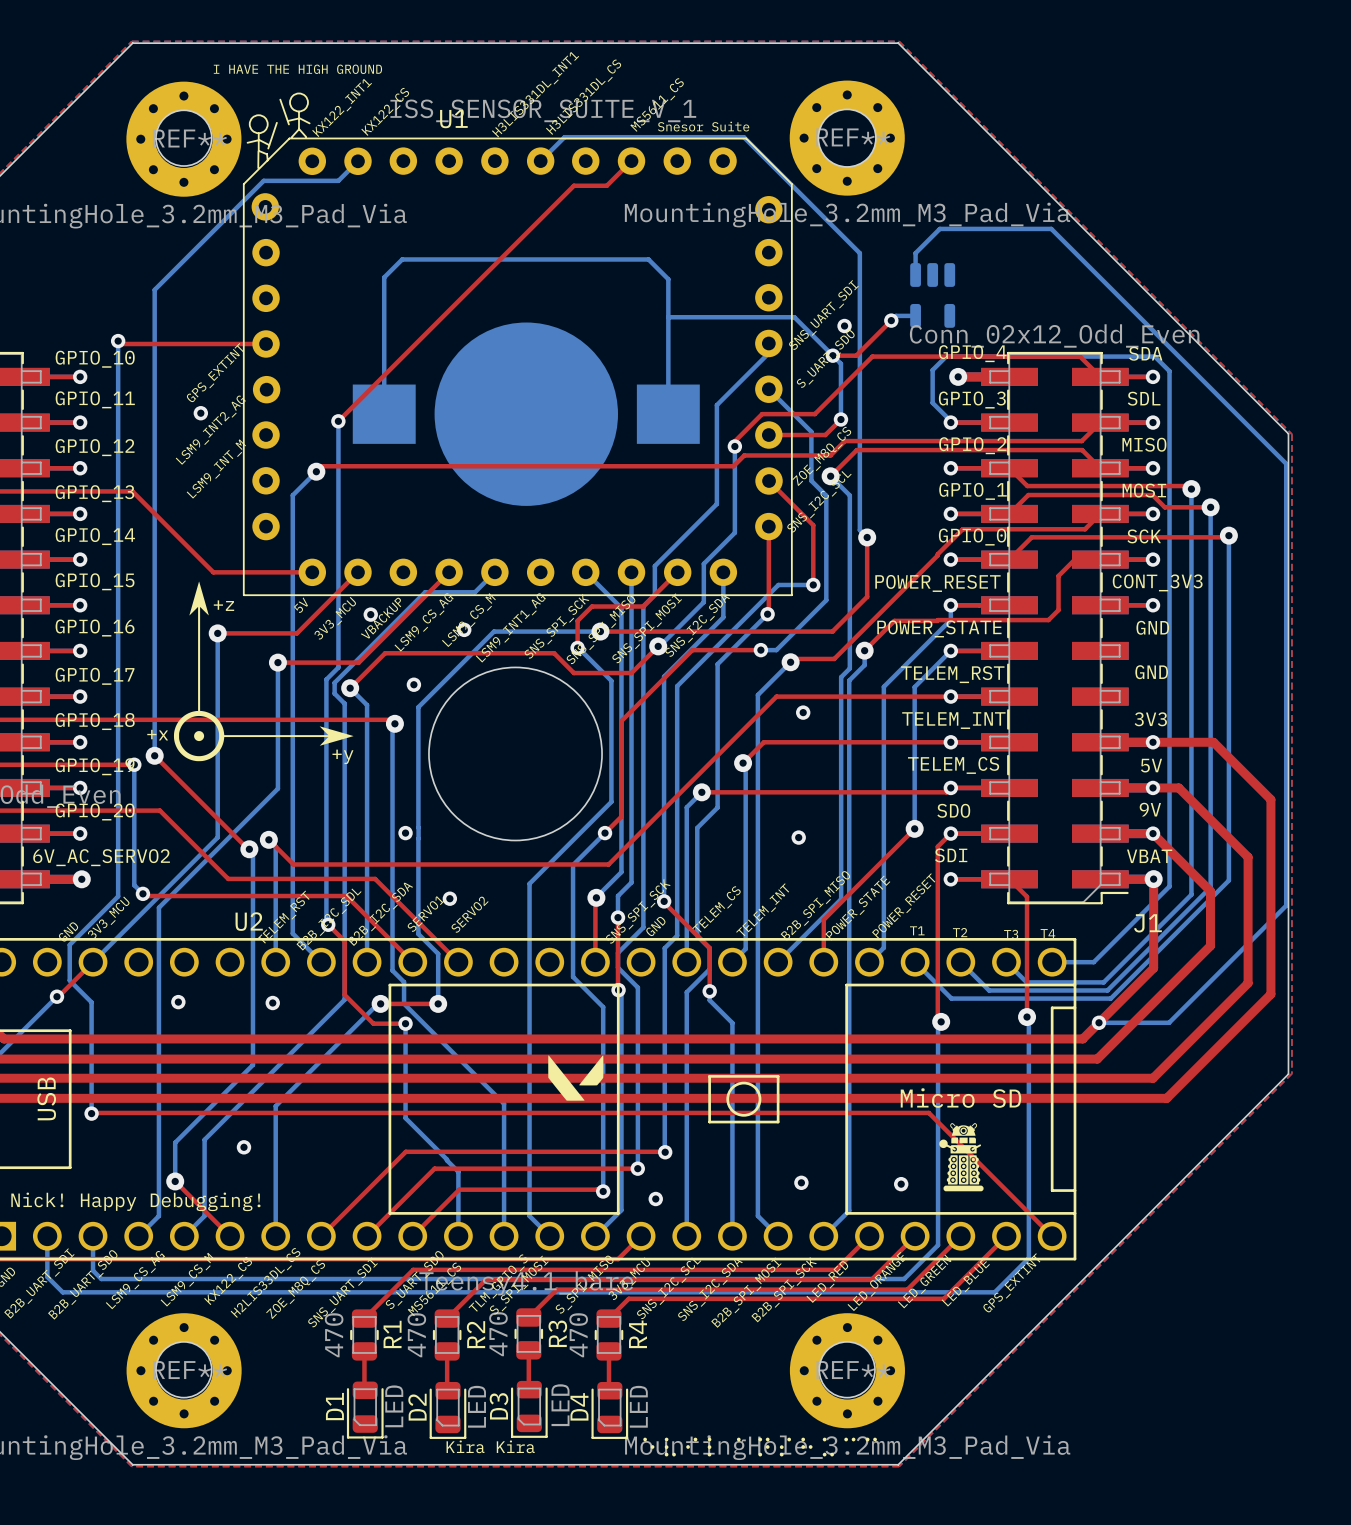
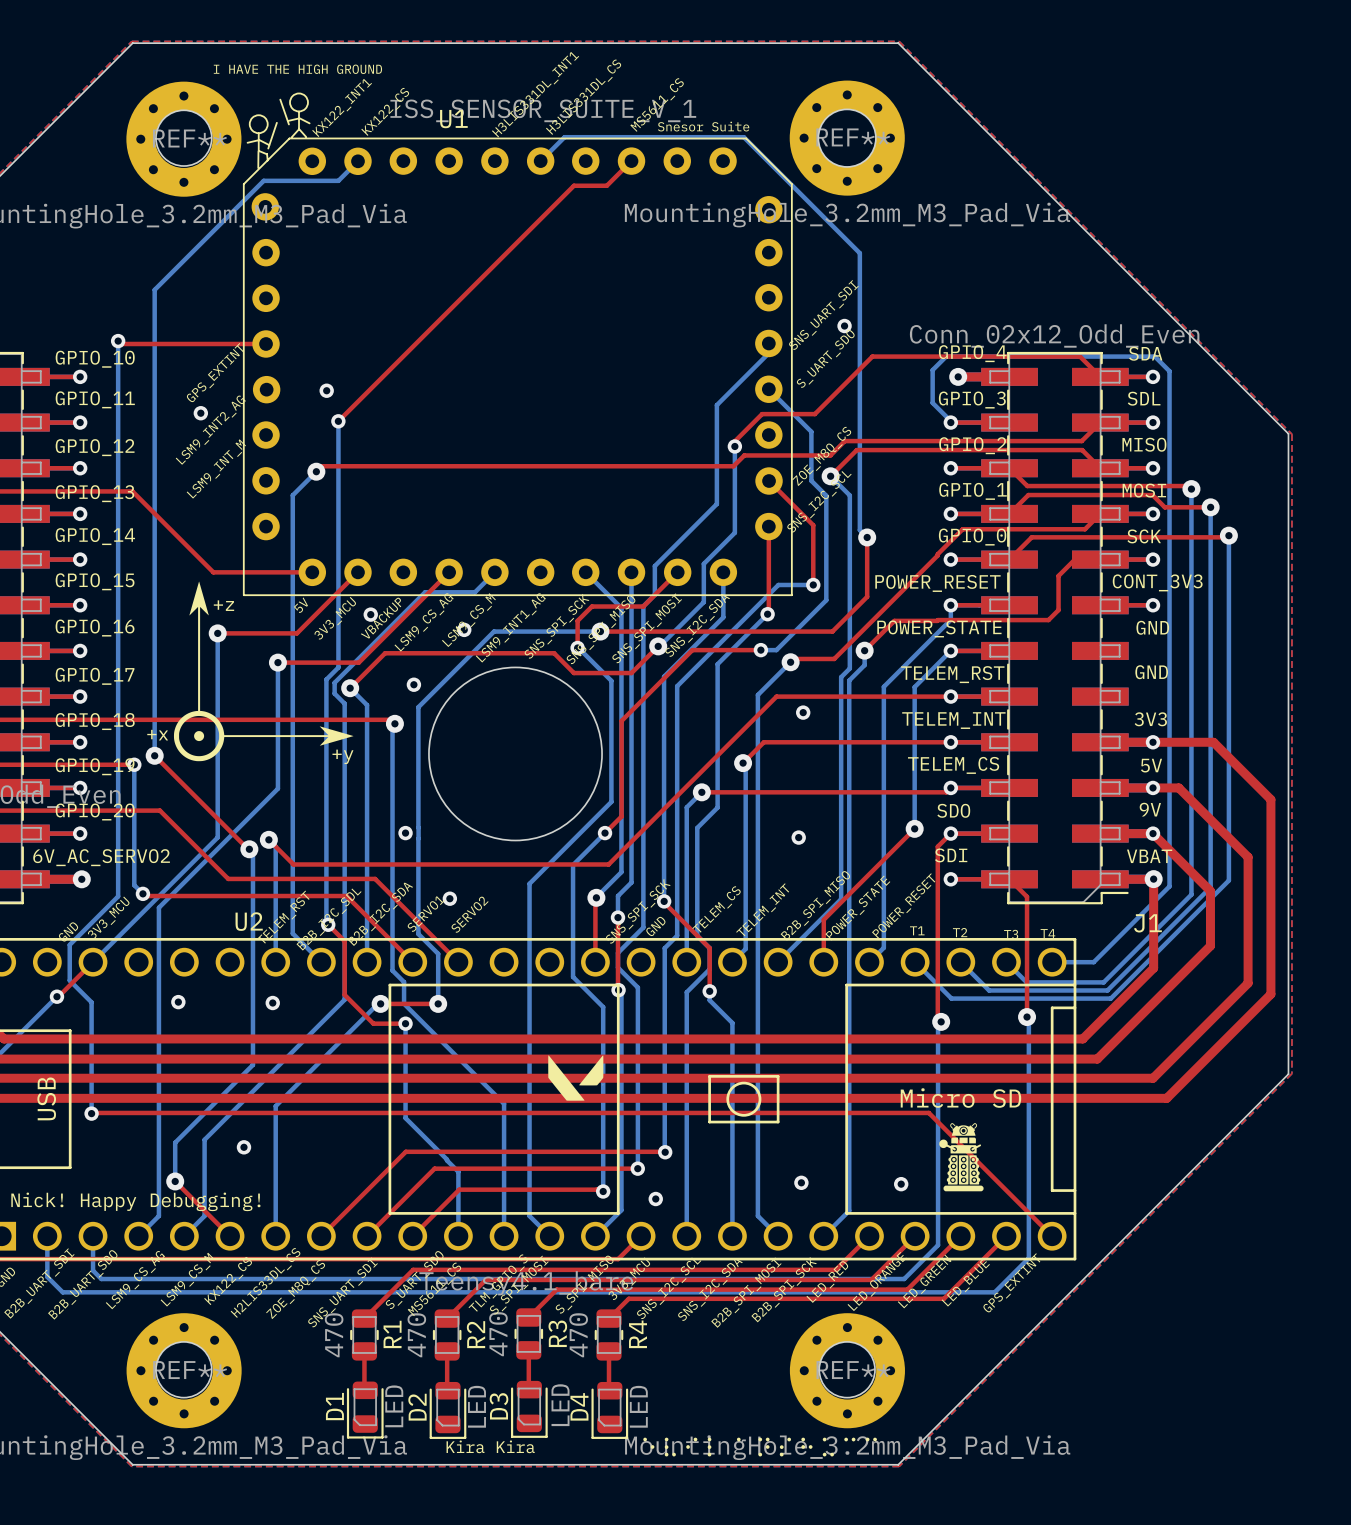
bottom track: (915, 274) (915, 253) (939, 228) (1051, 228) (1286, 463) (1286, 905) (1169, 1022) (1098, 1022) -> none
part: (932, 295) -> none
bottom track: (915, 315) (896, 315) (891, 320) -> none
bottom track: (668, 317) (794, 317) (840, 363) (840, 419) -> none
top track: (891, 320) (856, 355) (832, 355) -> none
via: (891, 320) -> none
via: (832, 355) -> none
via: none -> (326, 390)
bottom track: (384, 414) (384, 277) (402, 259) (648, 259) (668, 279) (668, 414) -> none
part: (526, 414) -> none
top track: (840, 419) (825, 435) (768, 435) -> none
via: (840, 419) -> none
via: (1098, 1022) -> none

